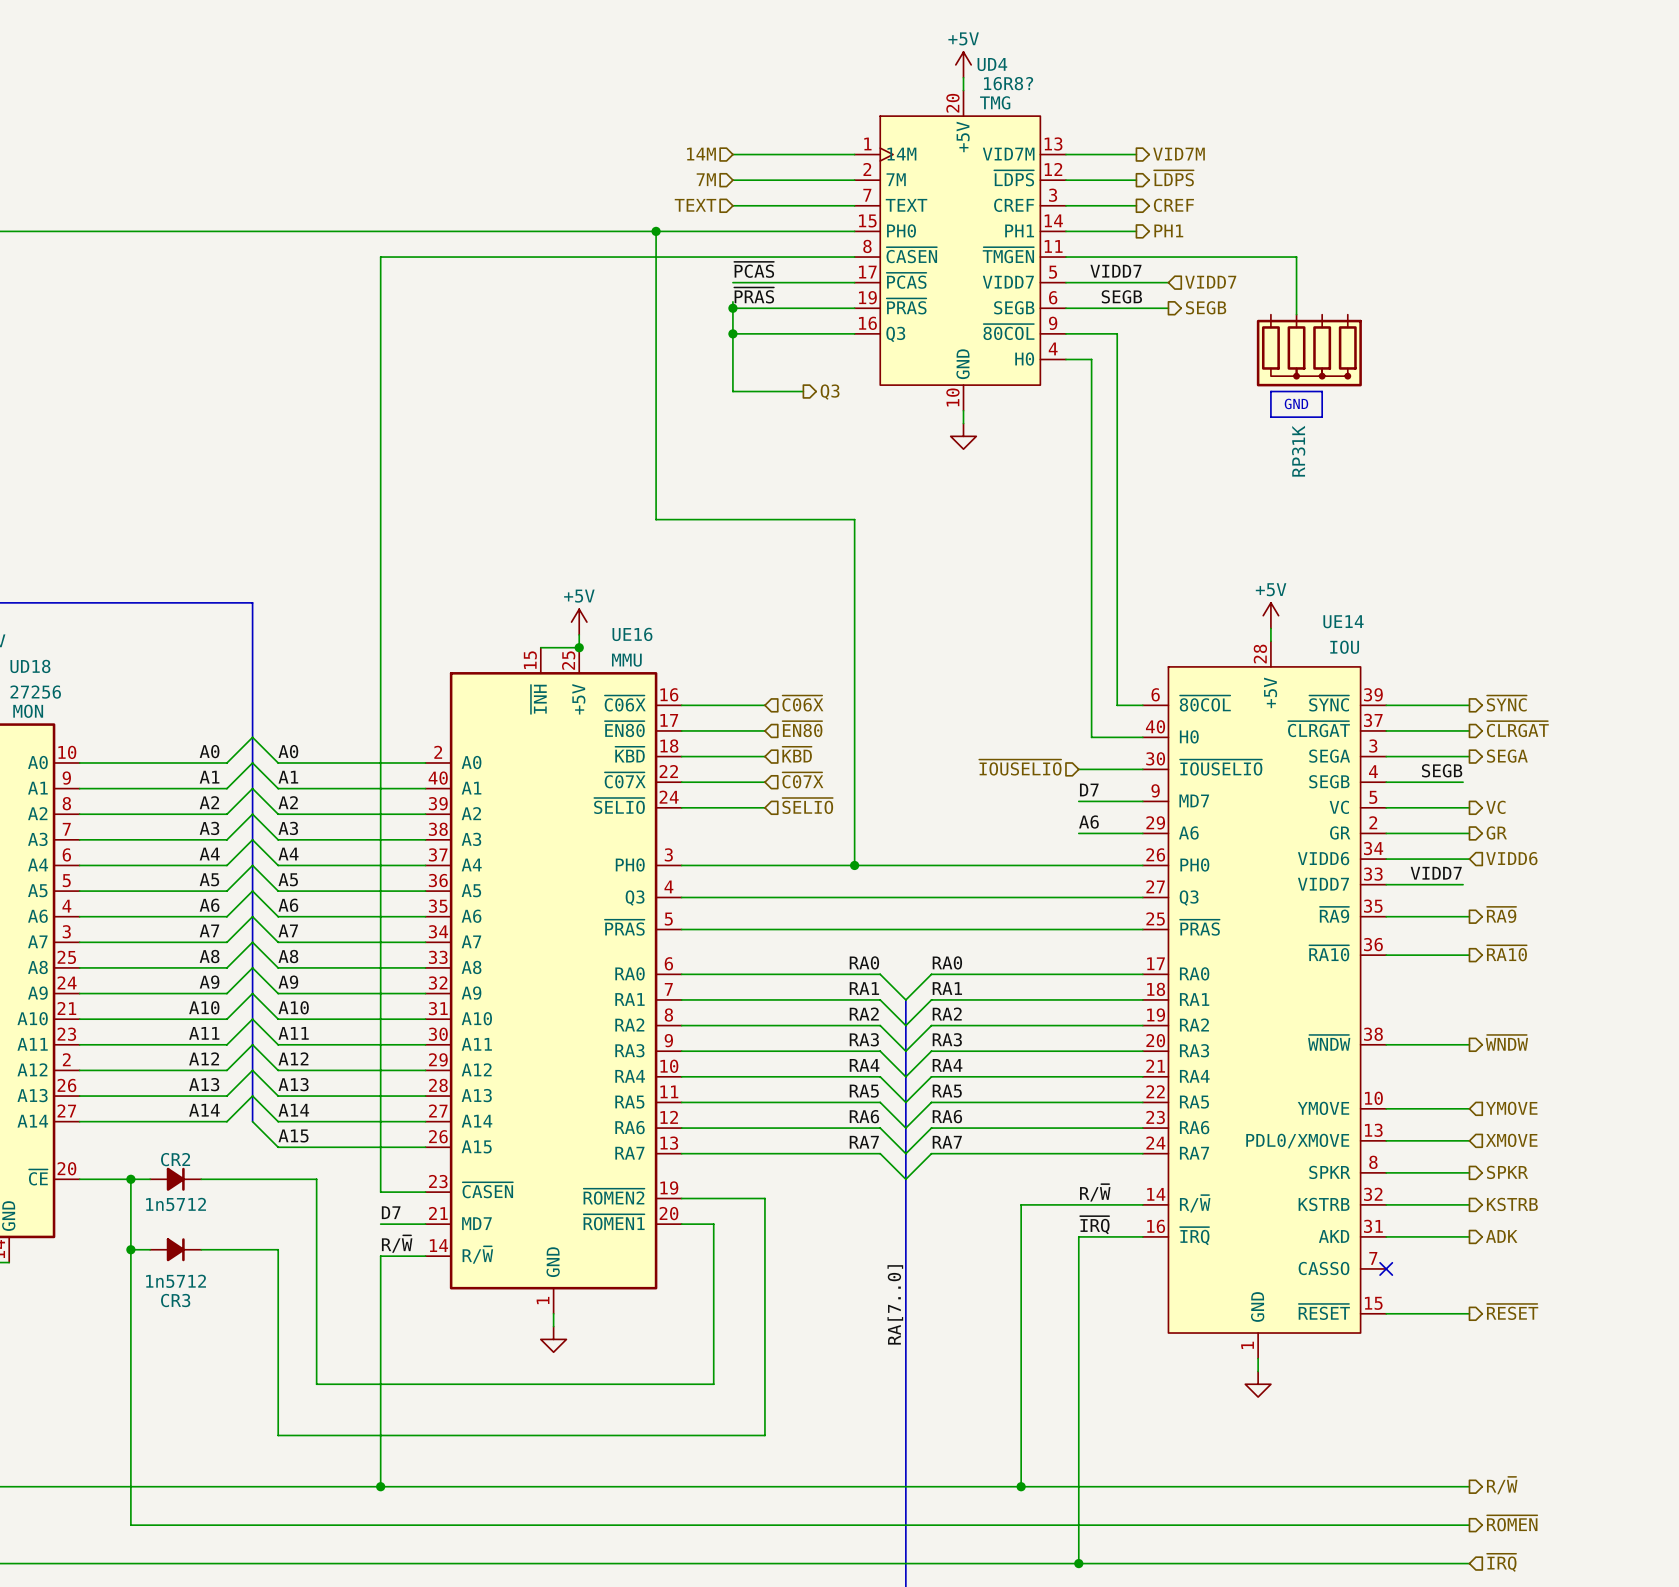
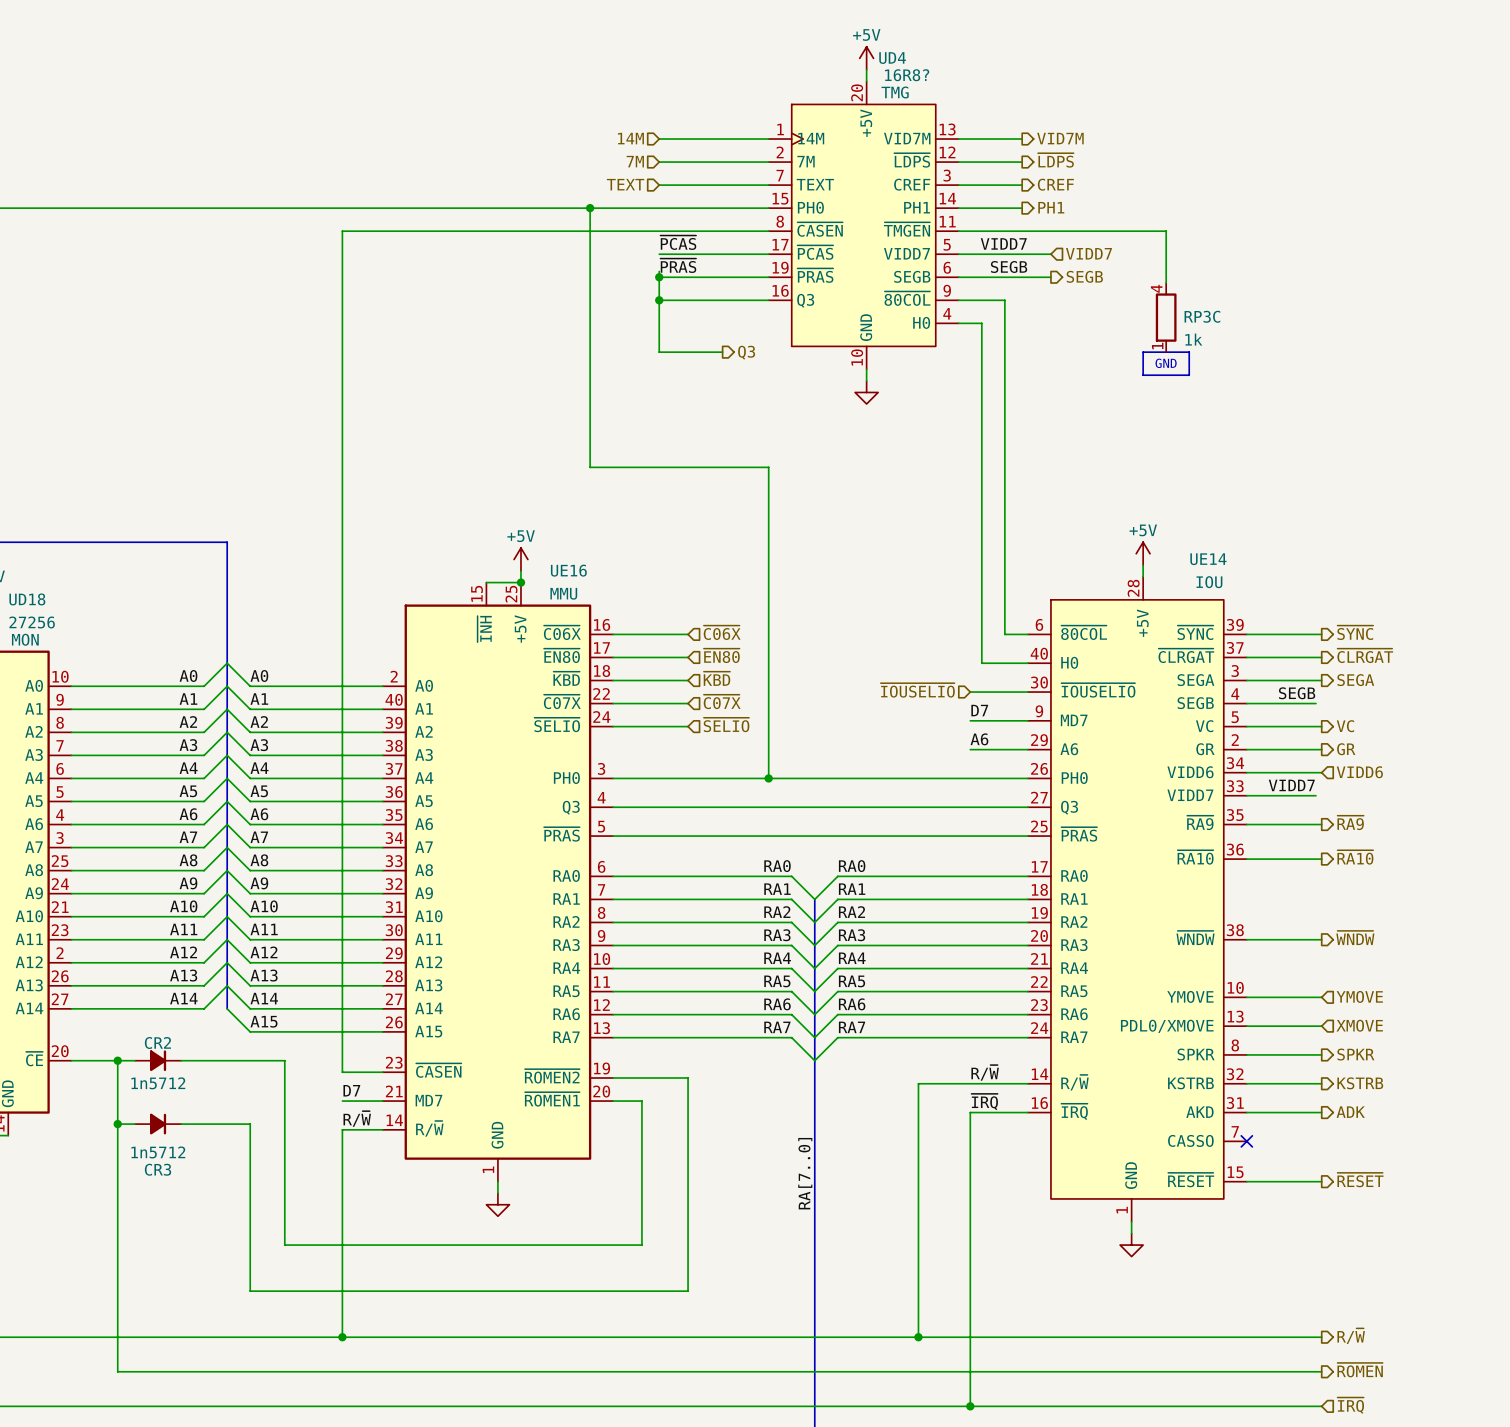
RP3: 1K (1309, 350) -> none
RP3C: none -> 1k (1166, 317)

